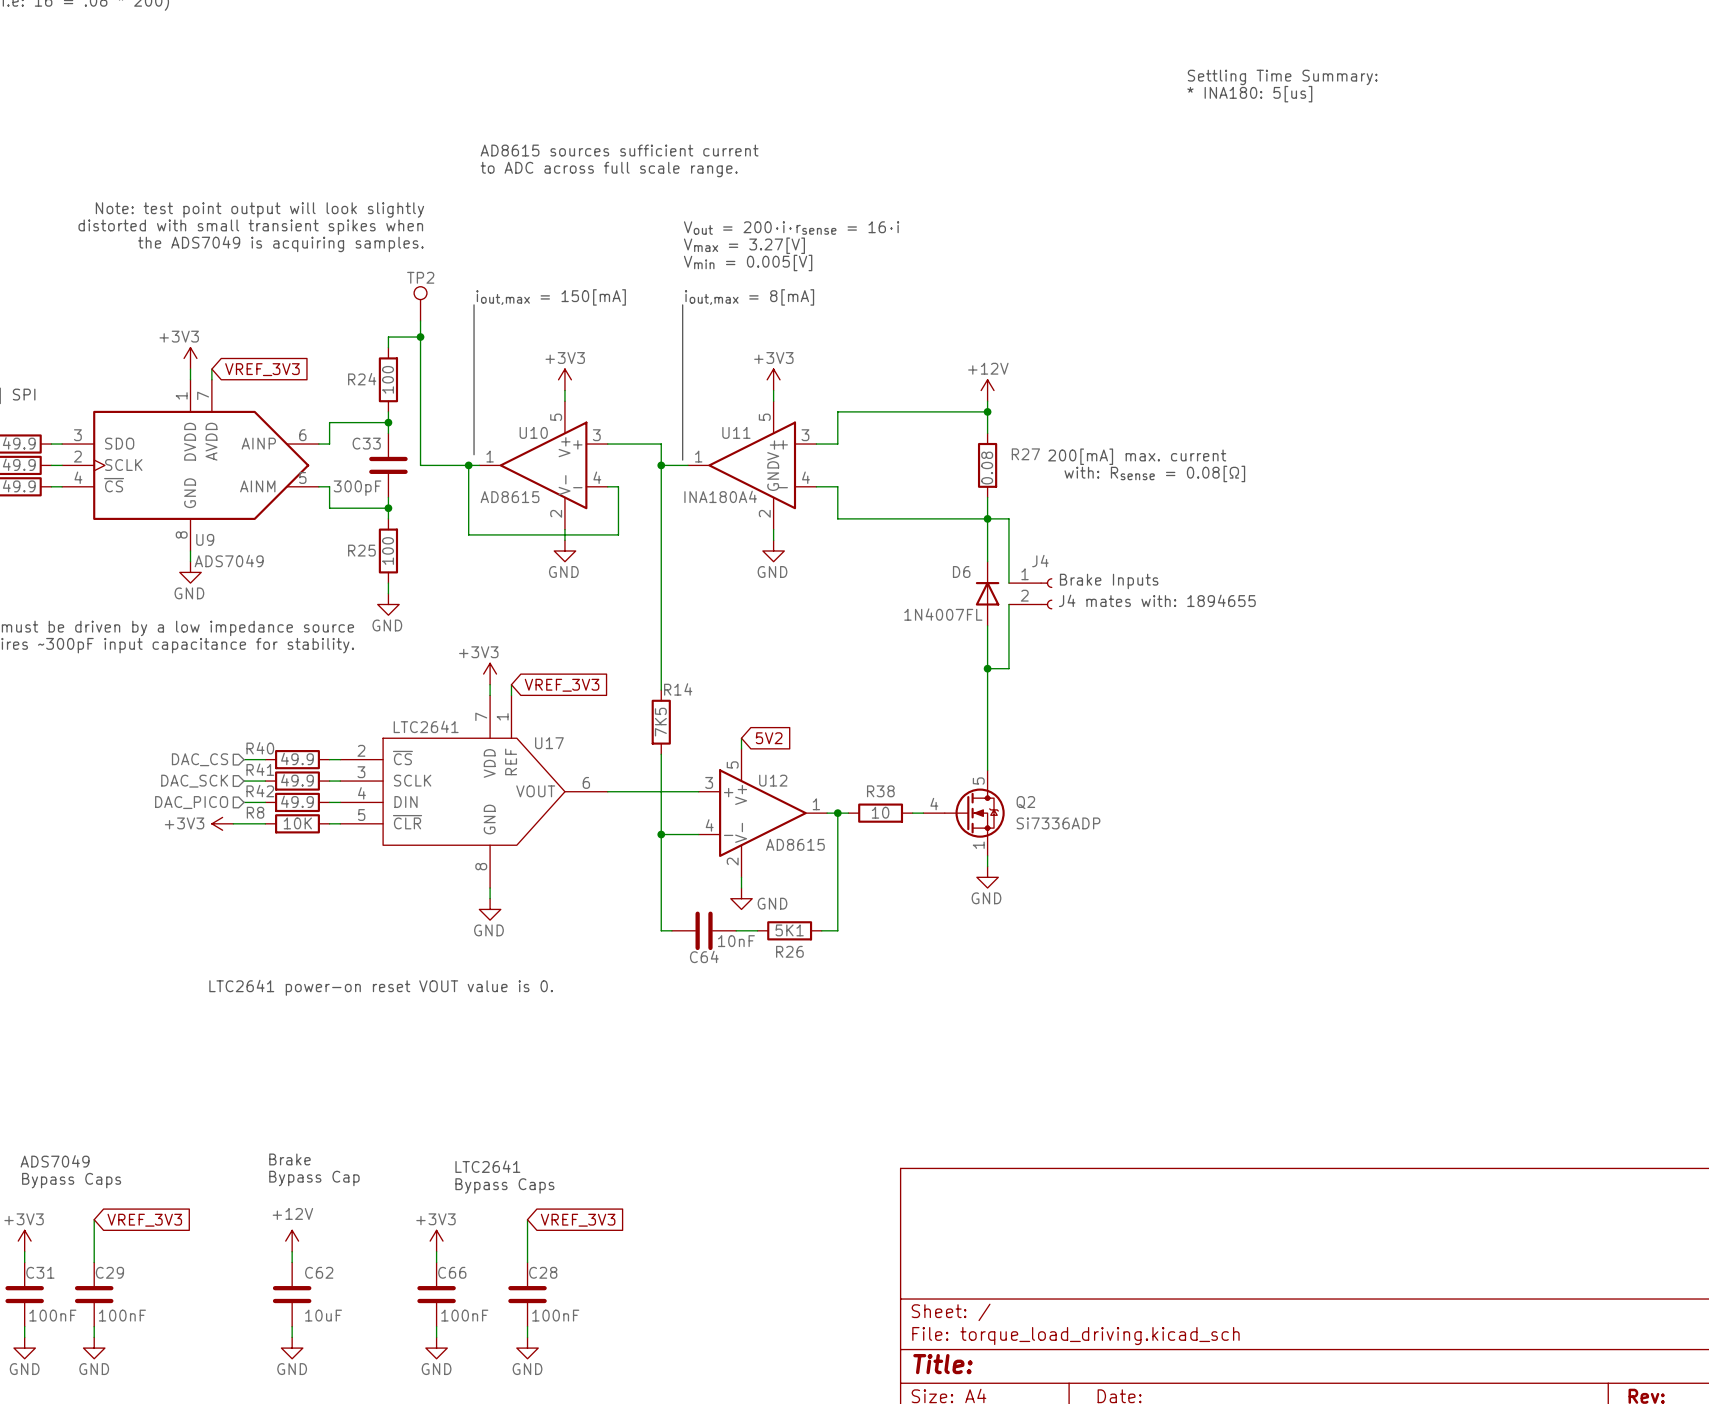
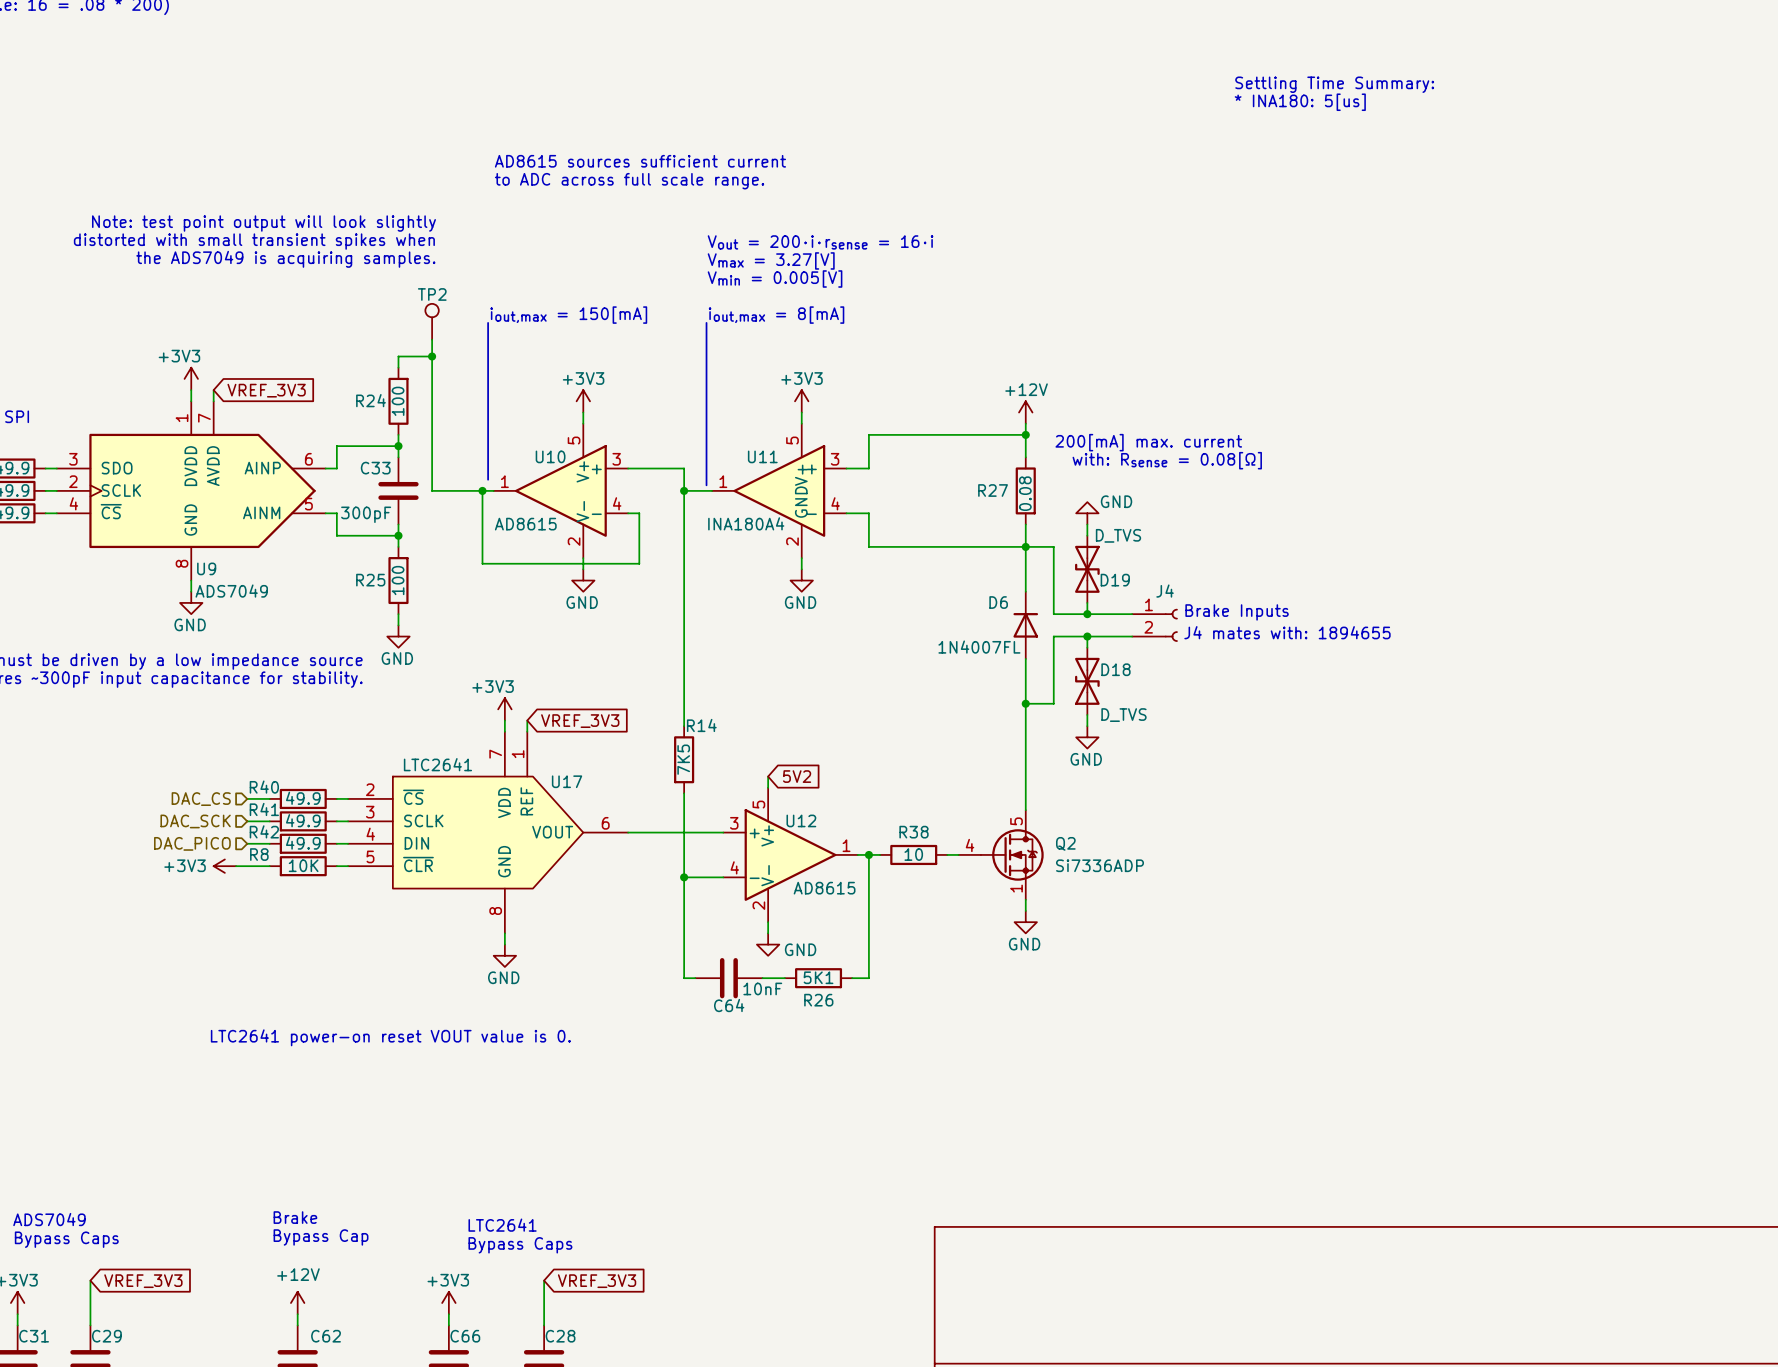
R27 name position: R27 (1025, 454) -> R27 (993, 490)
text position: 200[mA] max. current (1137, 456) -> 200[mA] max. current (1148, 442)
text position: with: Rsense = 0.08[Ω] (1154, 473) -> with: Rsense = 0.08[Ω] (1167, 460)
power symbol: none -> GND (1087, 513)
wire: none -> (1087, 524) (1087, 535)
wire: (1008, 518) (1008, 583) -> (1048, 546) (1053, 546) (1053, 614) (1132, 614)
D19: none -> D_TVS (1087, 569)
wire: none -> (1087, 602) (1087, 614)
text position: Brake Inputs (1109, 581) -> Brake Inputs (1237, 612)
junction: none -> (1087, 614)
J4 position: (1030, 593) -> (1154, 625)
text position: J4 mates with: 1894655 (1157, 600) -> J4 mates with: 1894655 (1287, 632)
wire: (1008, 604) (1008, 668) -> (1132, 636) (1053, 636) (1053, 703) (1048, 703)
wire: none -> (1087, 636) (1087, 647)
junction: none -> (1087, 636)
D18: none -> D_TVS (1087, 681)
wire: none -> (1087, 714) (1087, 726)
power symbol: none -> GND (1087, 737)

